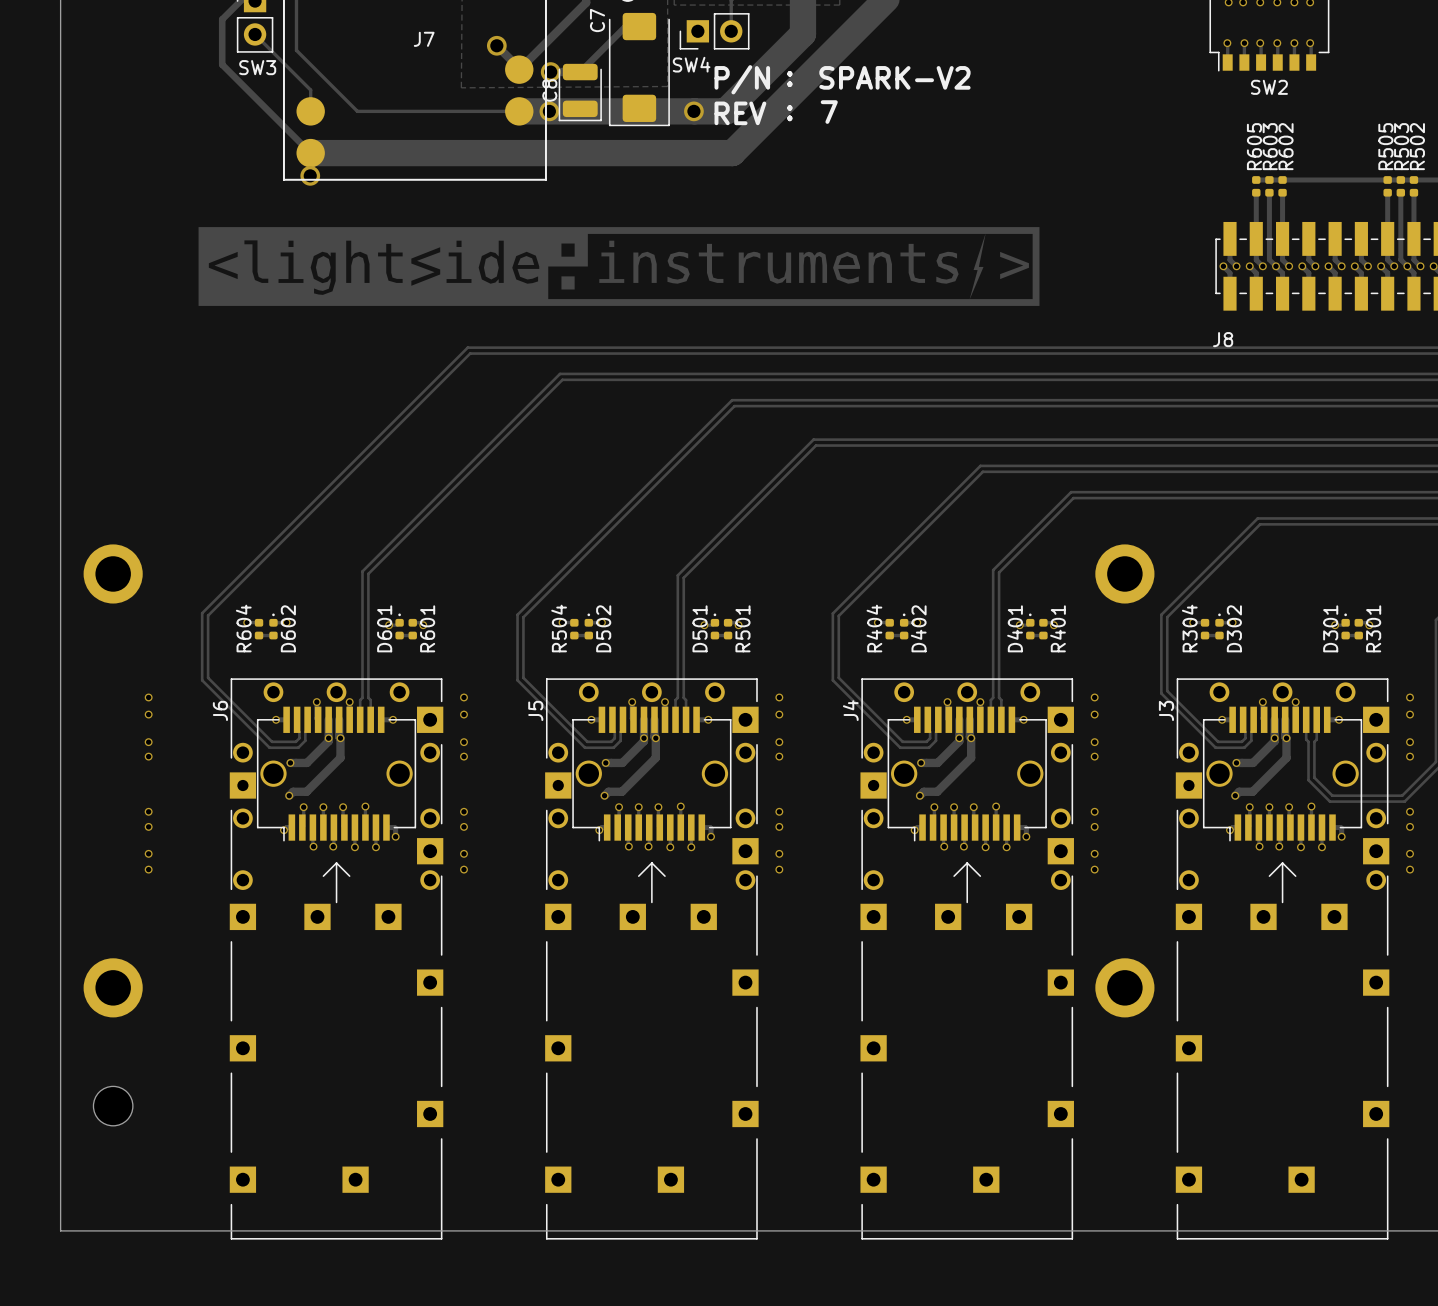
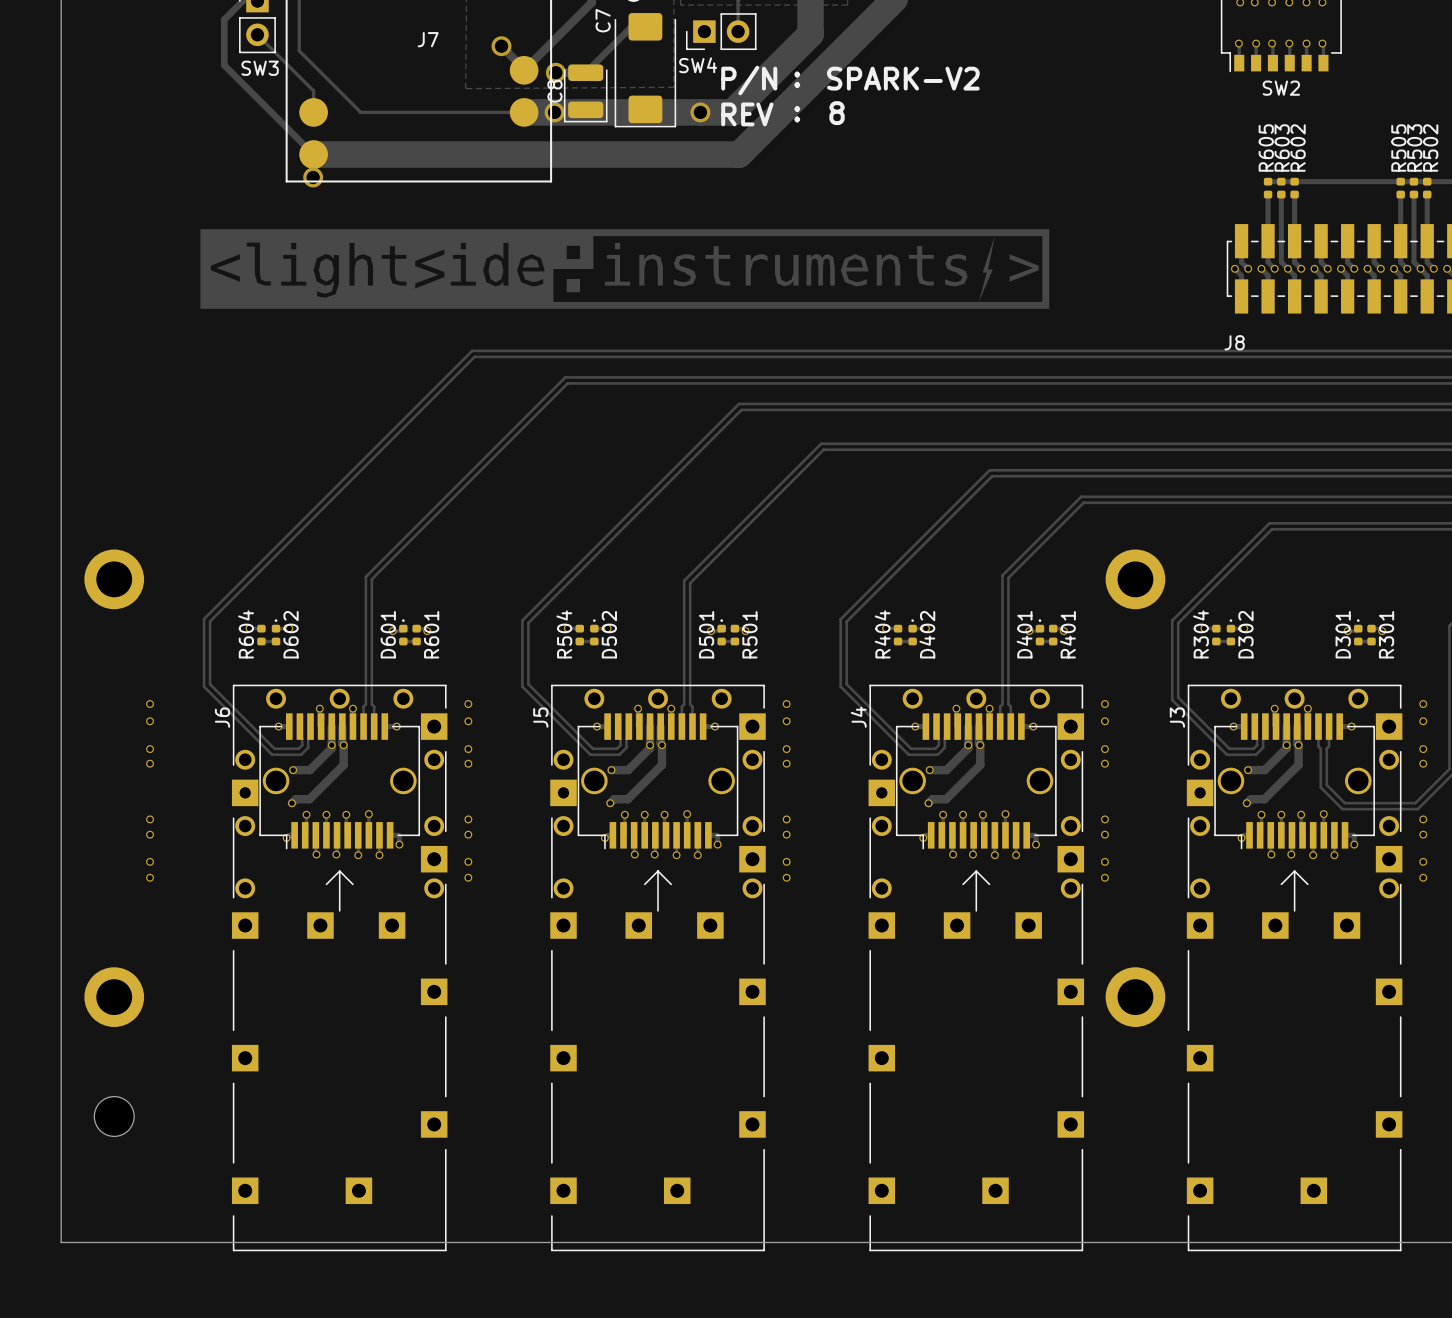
text: 7 (829, 112) -> 8 (837, 113)

